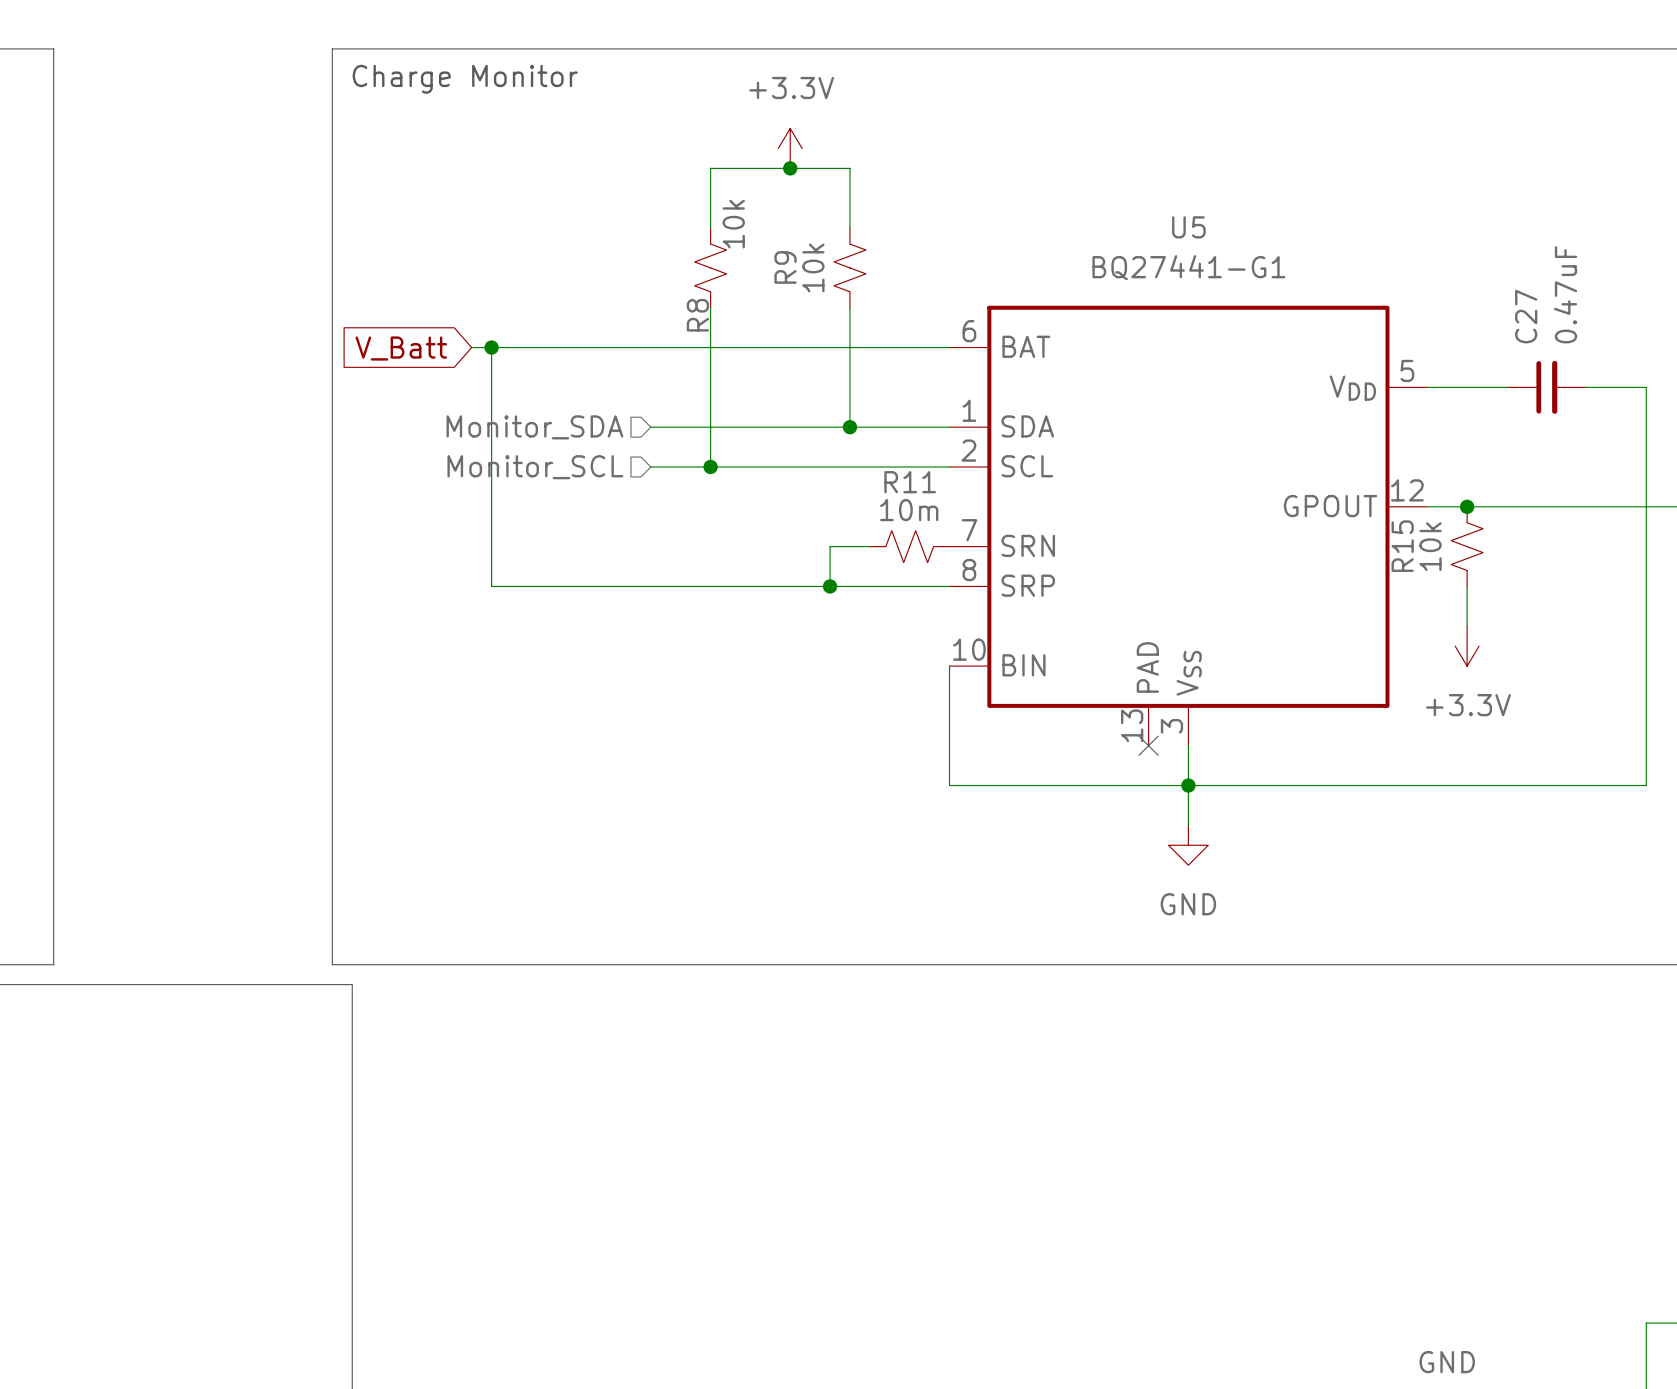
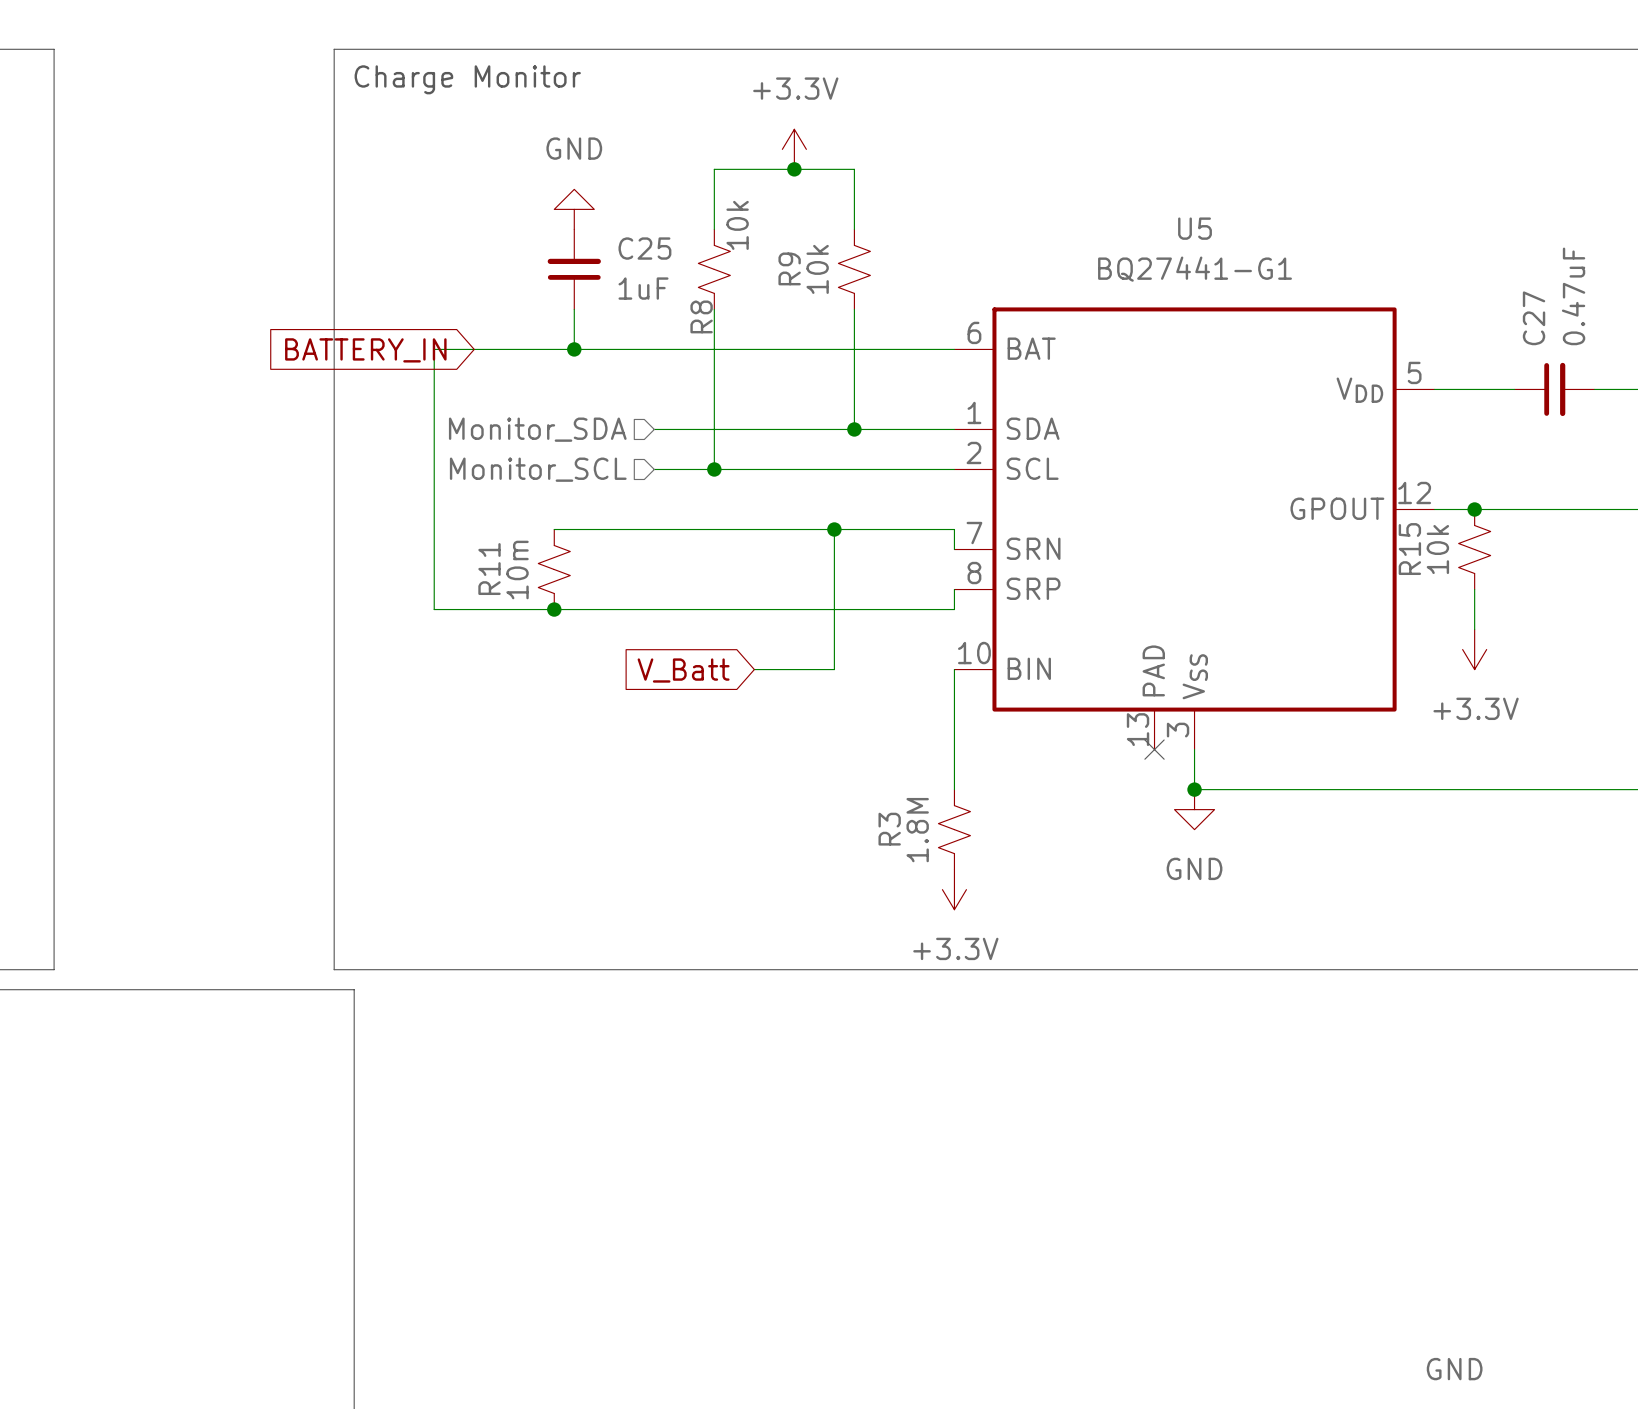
power symbol: none -> GND (574, 209)
C25: none -> 1uF (574, 269)
wire: none -> (574, 309) (574, 349)
wire: (491, 347) (491, 586) (949, 586) -> (474, 349) (434, 349) (434, 609) (954, 609) (954, 589)
junction position: (491, 347) -> (574, 349)
global label: V_Batt (401, 348) -> BATTERY_IN (365, 350)
R11 name position: R11 (910, 482) -> R11 (489, 569)
R11 value position: 10m (909, 510) -> 10m (517, 570)
wire: none -> (554, 529) (954, 529) (954, 549)
wire: (830, 546) (869, 546) -> (834, 549) (834, 529)
R11 rotation: 0° (909, 546) -> 90° clockwise (554, 569)
R11 position: (909, 546) -> (554, 569)
wire: none -> (834, 589) (834, 669) (754, 669)
junction position: (830, 586) -> (834, 529)
junction: none -> (554, 609)
global label: none -> V_Batt (683, 670)
wire: (949, 785) (1188, 785) (1188, 825) -> none
R3: none -> 1.8M (954, 829)
power symbol position: GND (1188, 845) -> GND (1194, 809)
power symbol: none -> +3.3V (954, 889)

